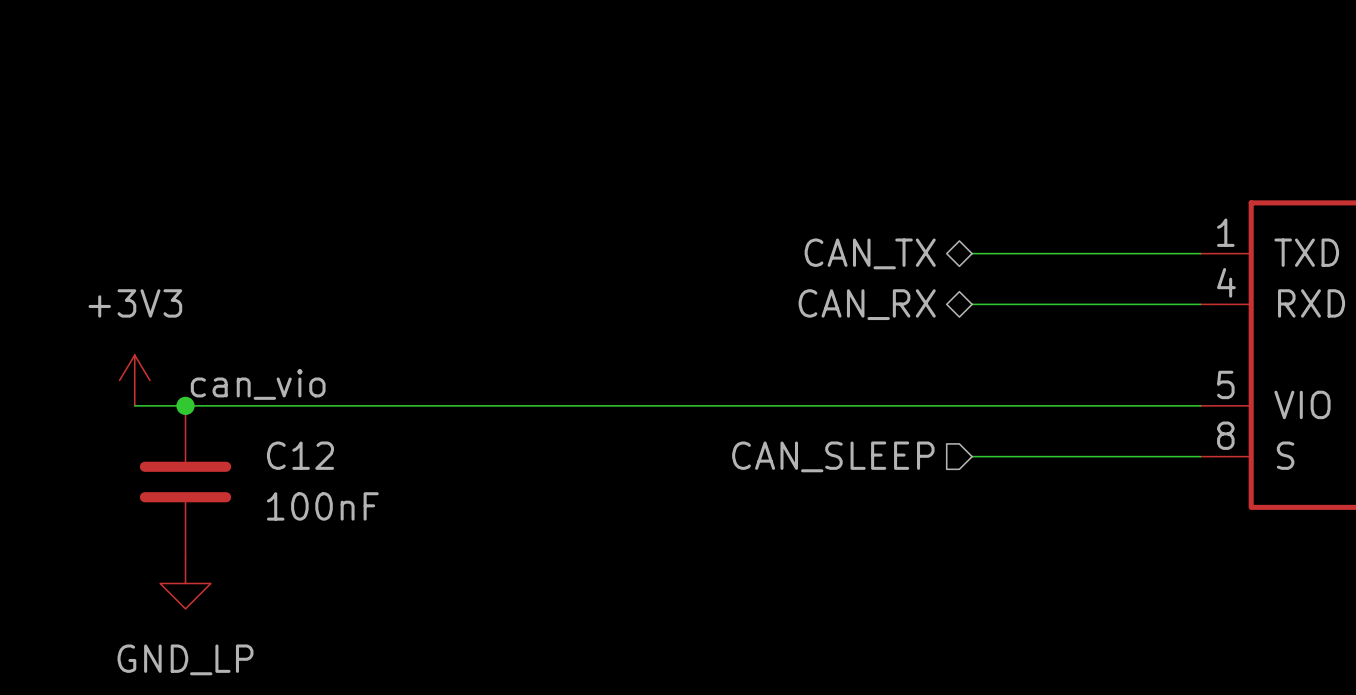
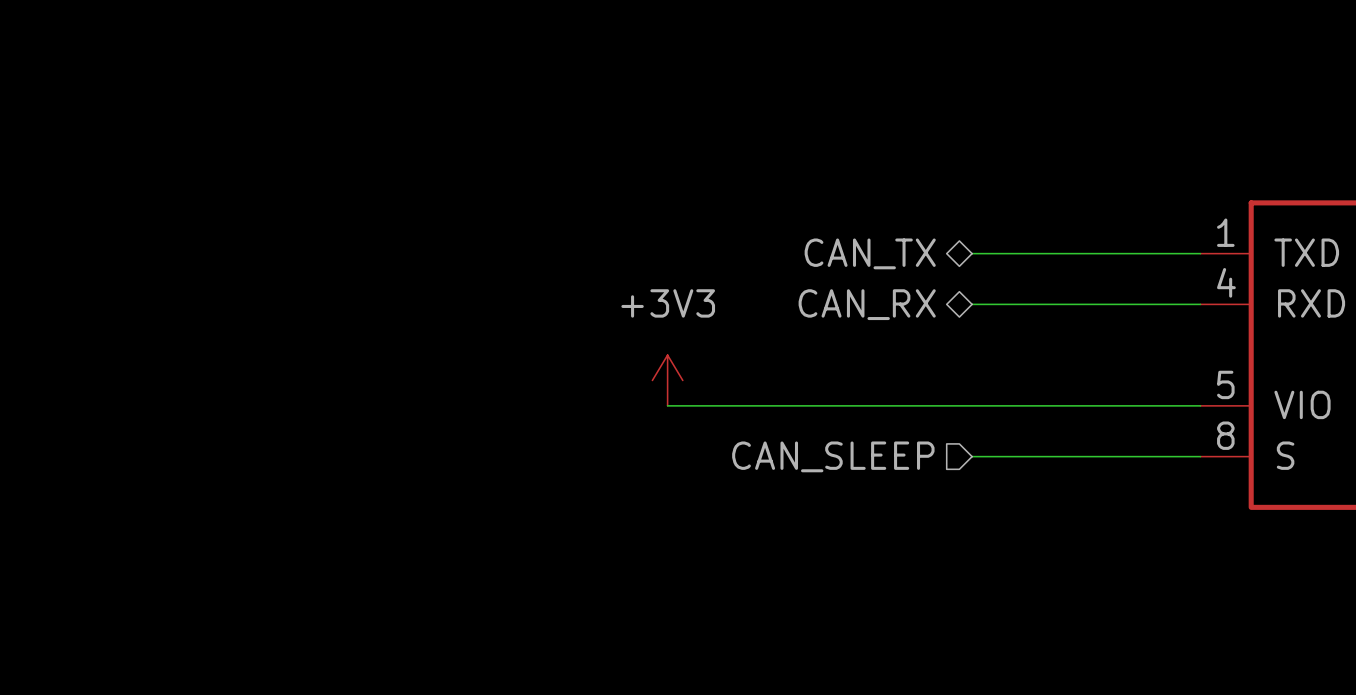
power symbol: +3V3 (134, 380) -> none
power symbol: none -> +3V3 (667, 380)
label: can_vio (258, 384) -> none
wire: (134, 405) (667, 405) -> none
junction: (185, 405) -> none
C12: 100nF (185, 482) -> none
power symbol: GND_LP (185, 583) -> none

